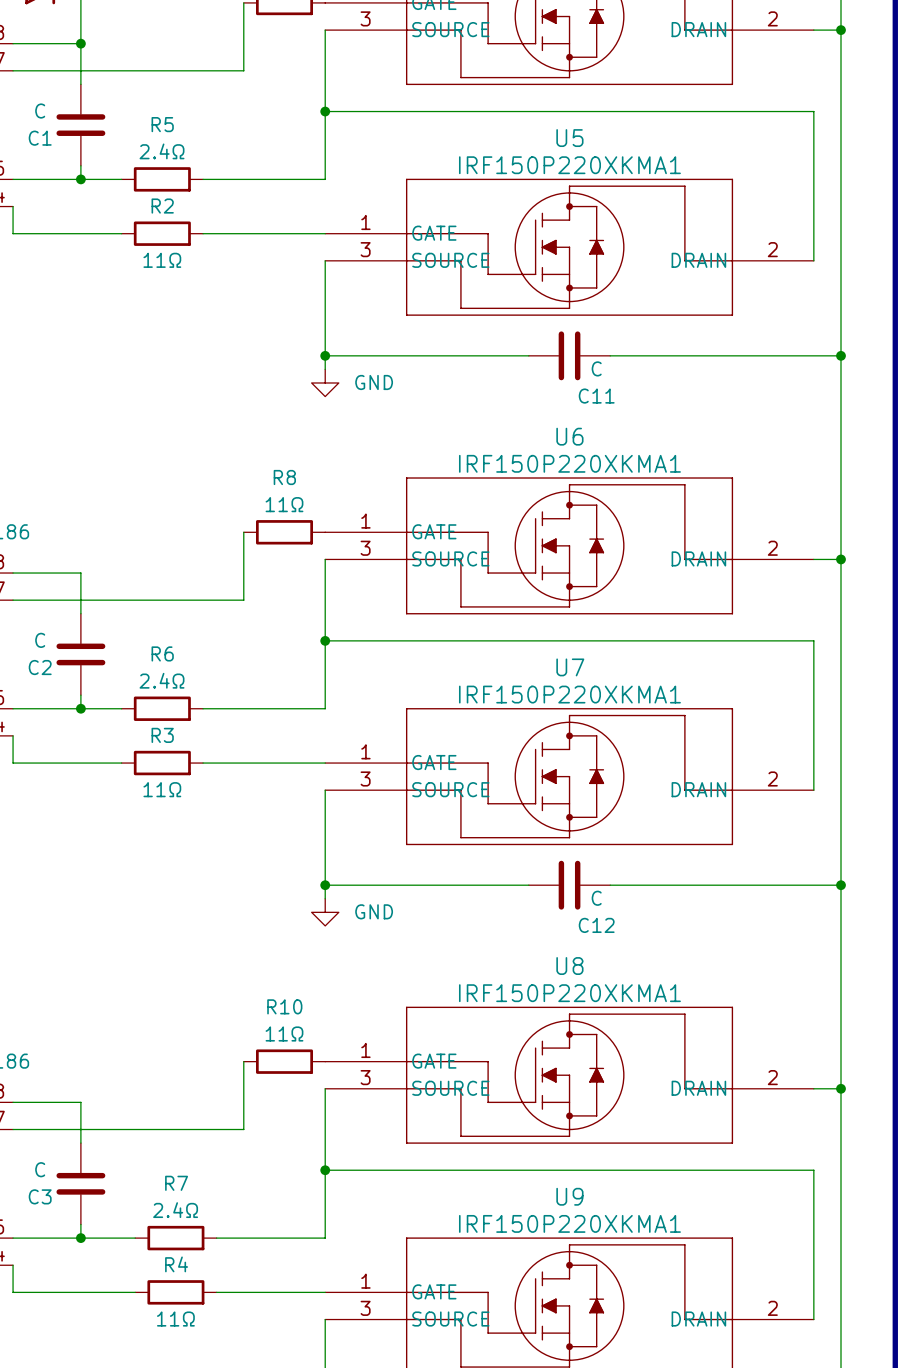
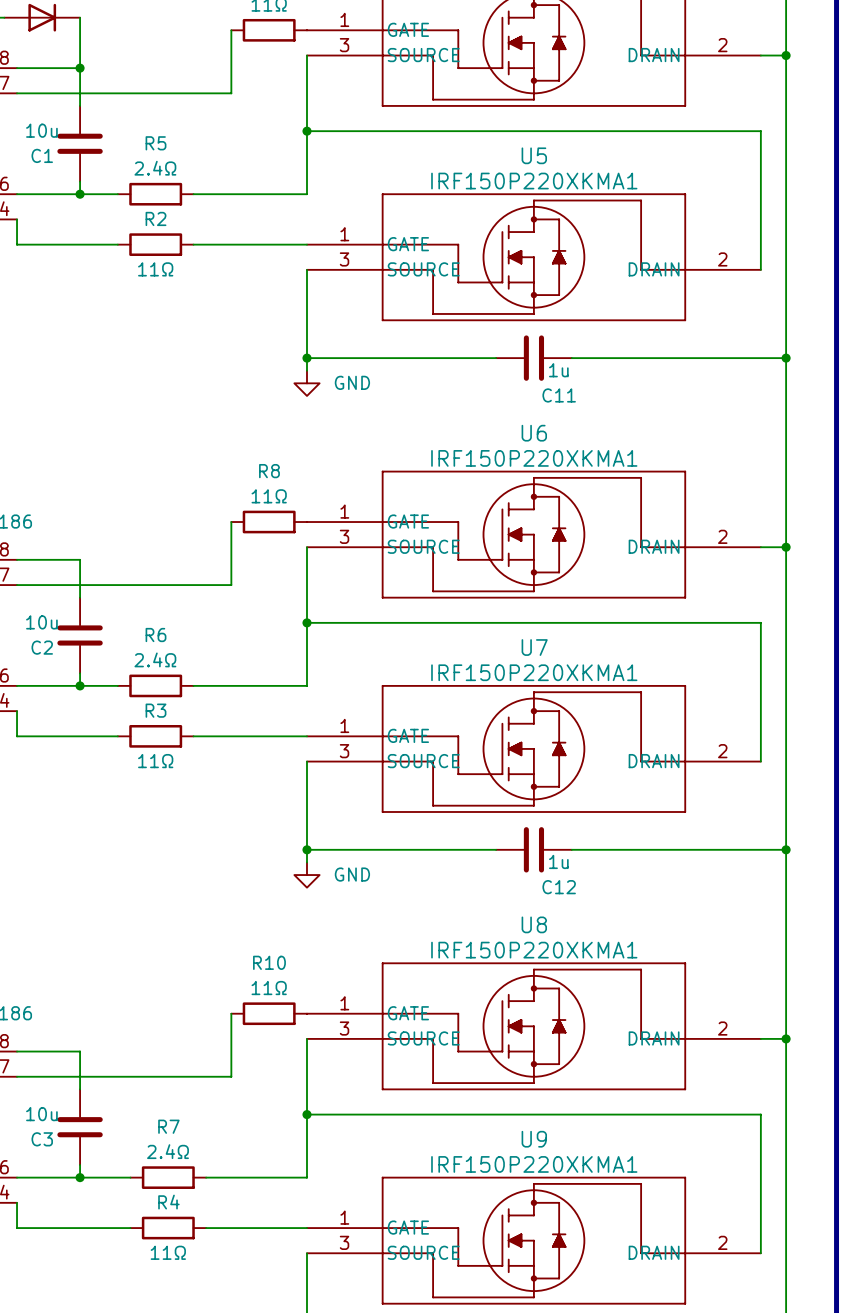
C1 value: C (40, 111) -> 10u (41, 130)
C11 value: C (596, 368) -> 1u (558, 370)
C2 value: C (40, 640) -> 10u (41, 622)
C12 value: C (596, 898) -> 1u (558, 861)
C3 value: C (40, 1169) -> 10u (41, 1114)

